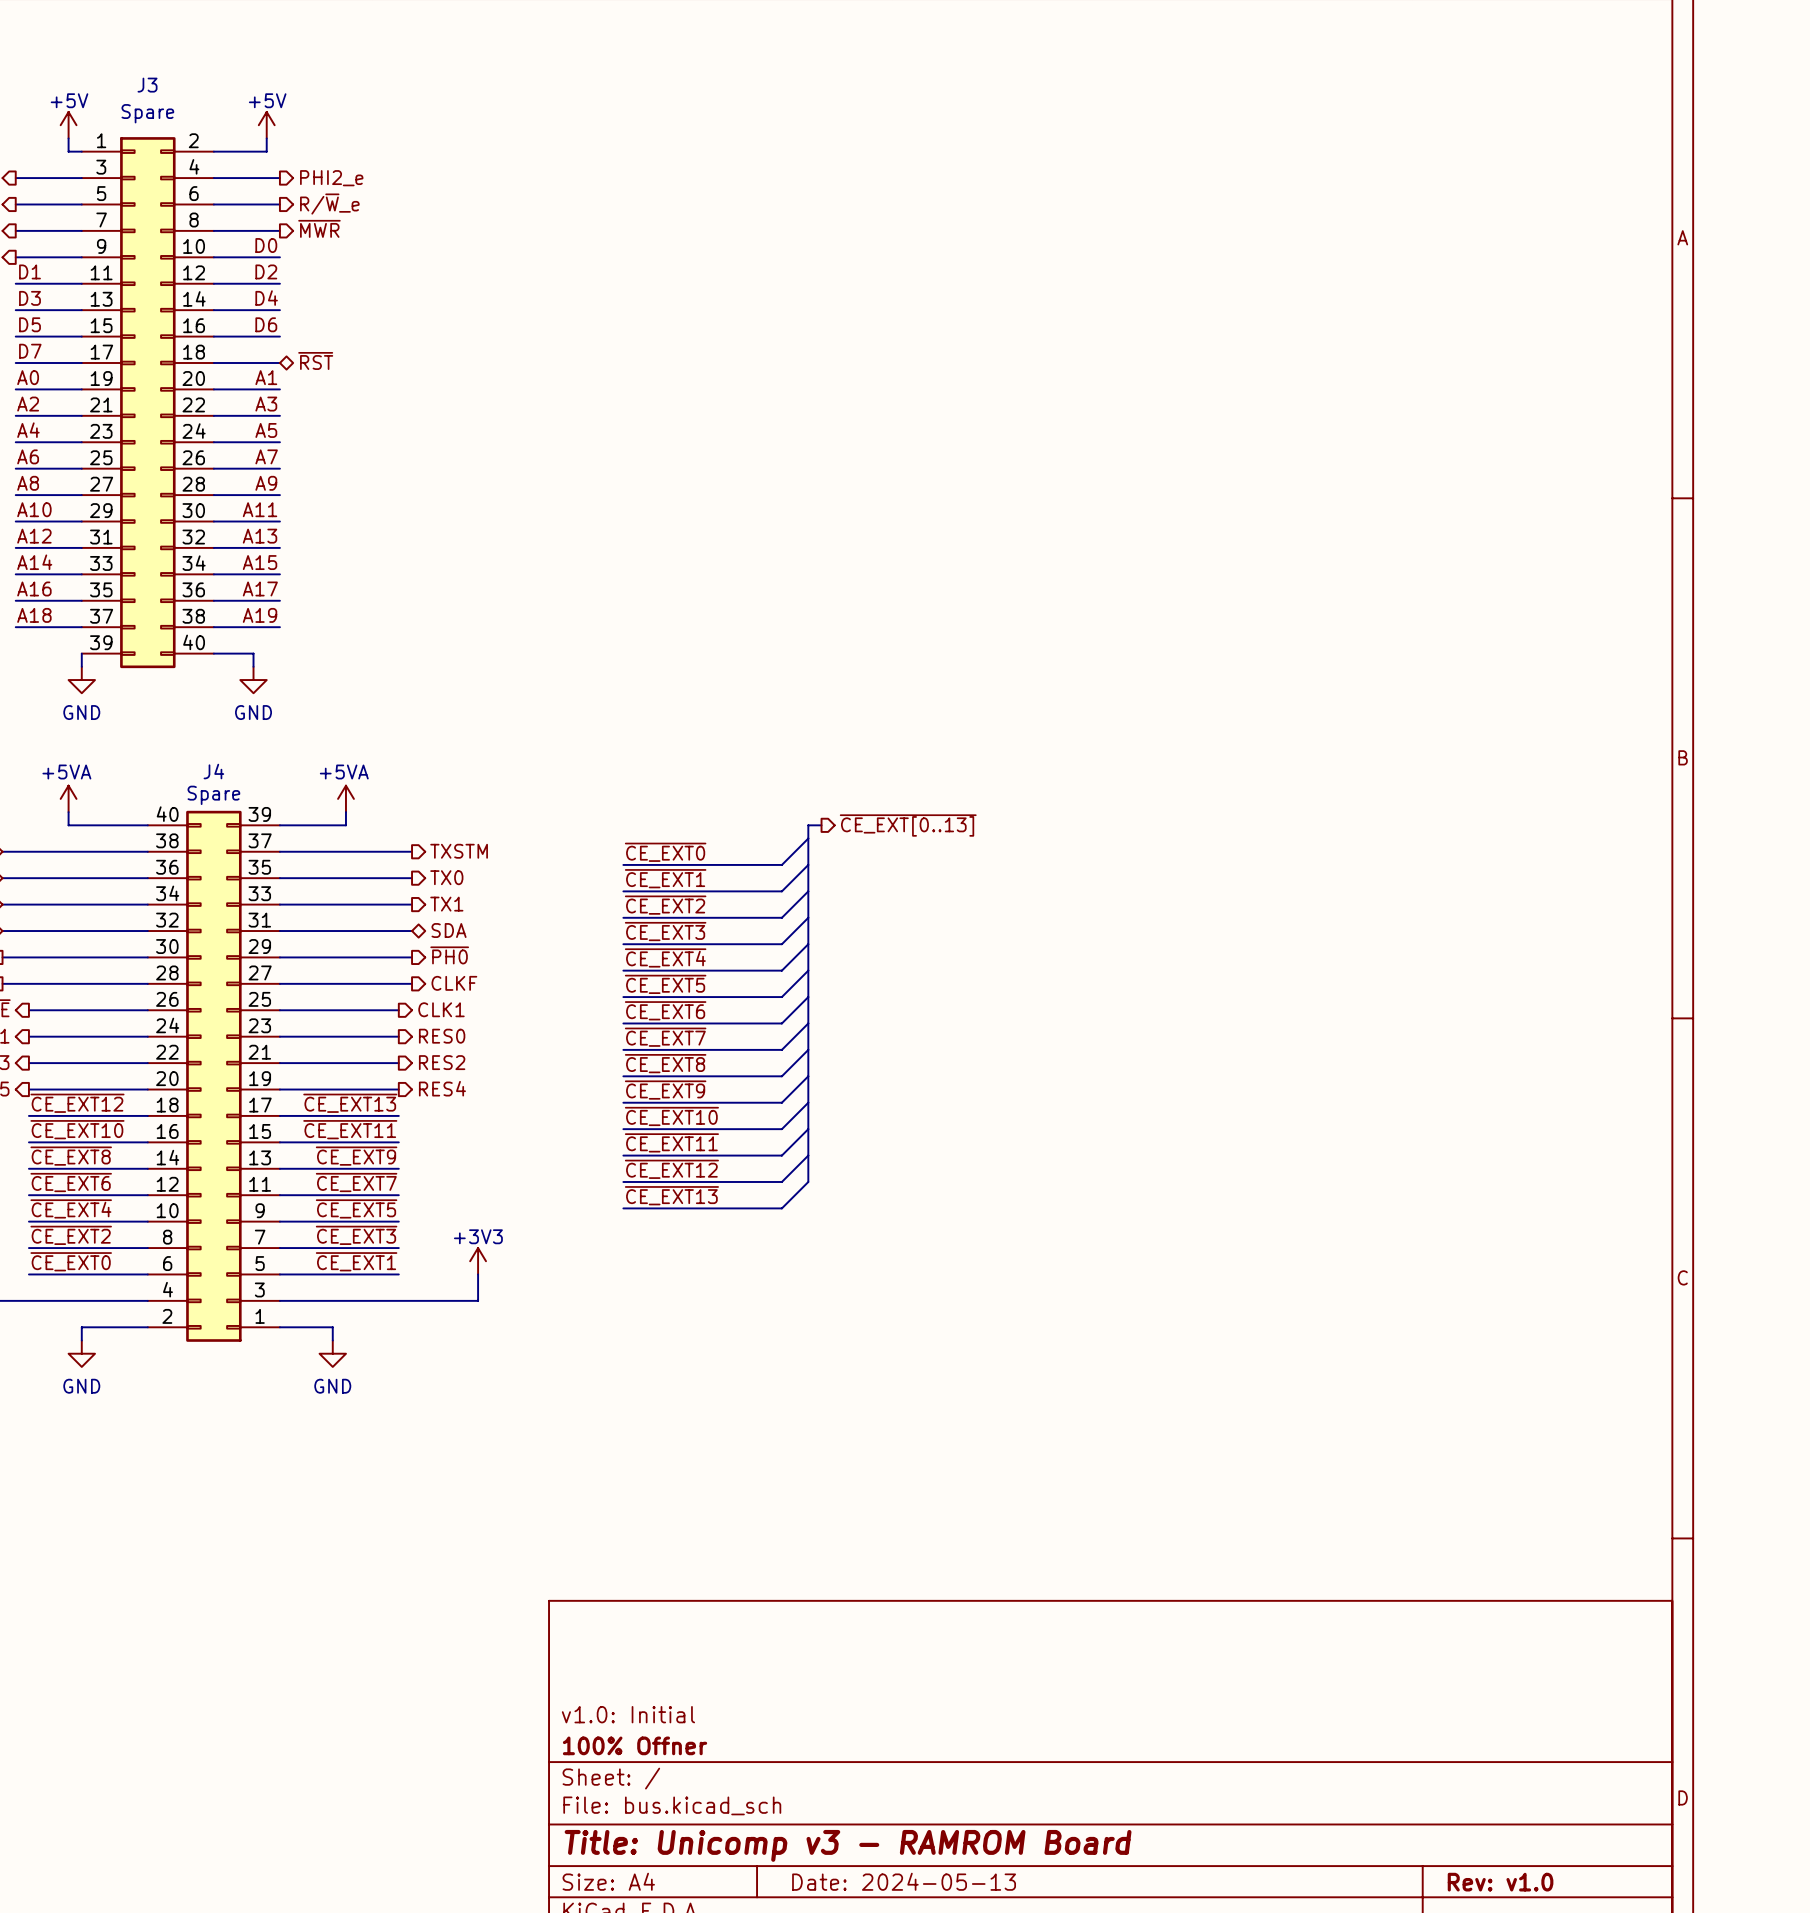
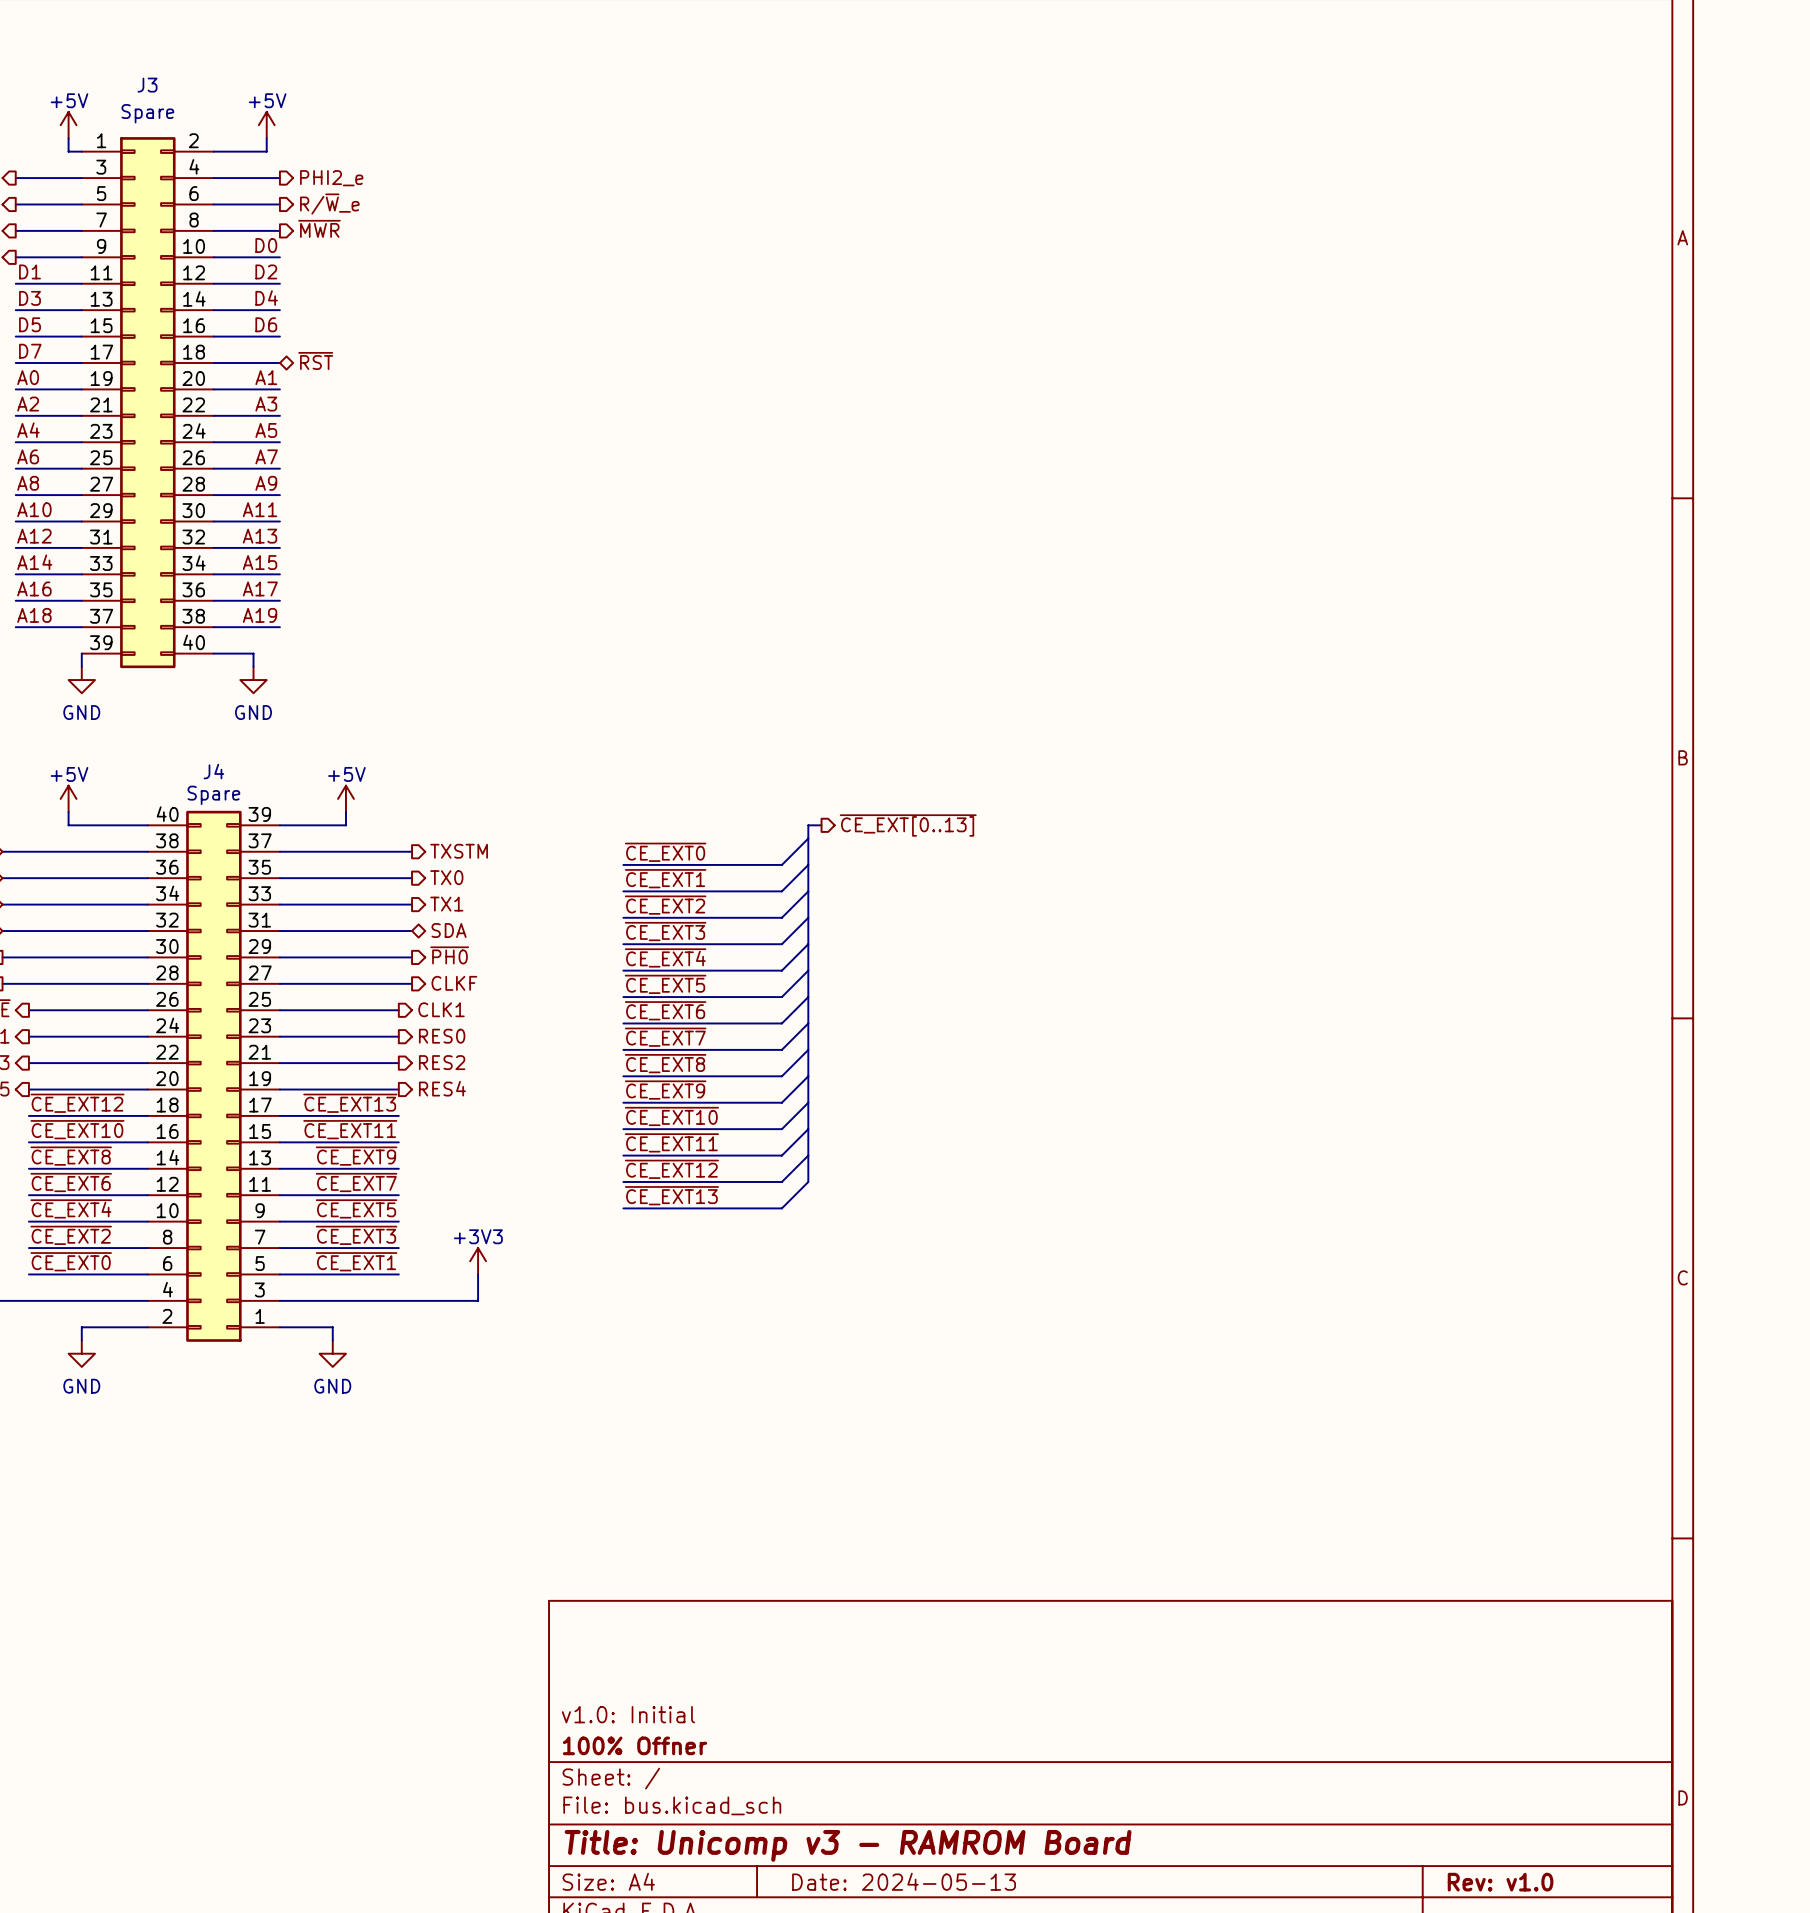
power symbol: +5VA (68, 798) -> +5V (68, 798)
power symbol: +5VA (345, 798) -> +5V (345, 798)

